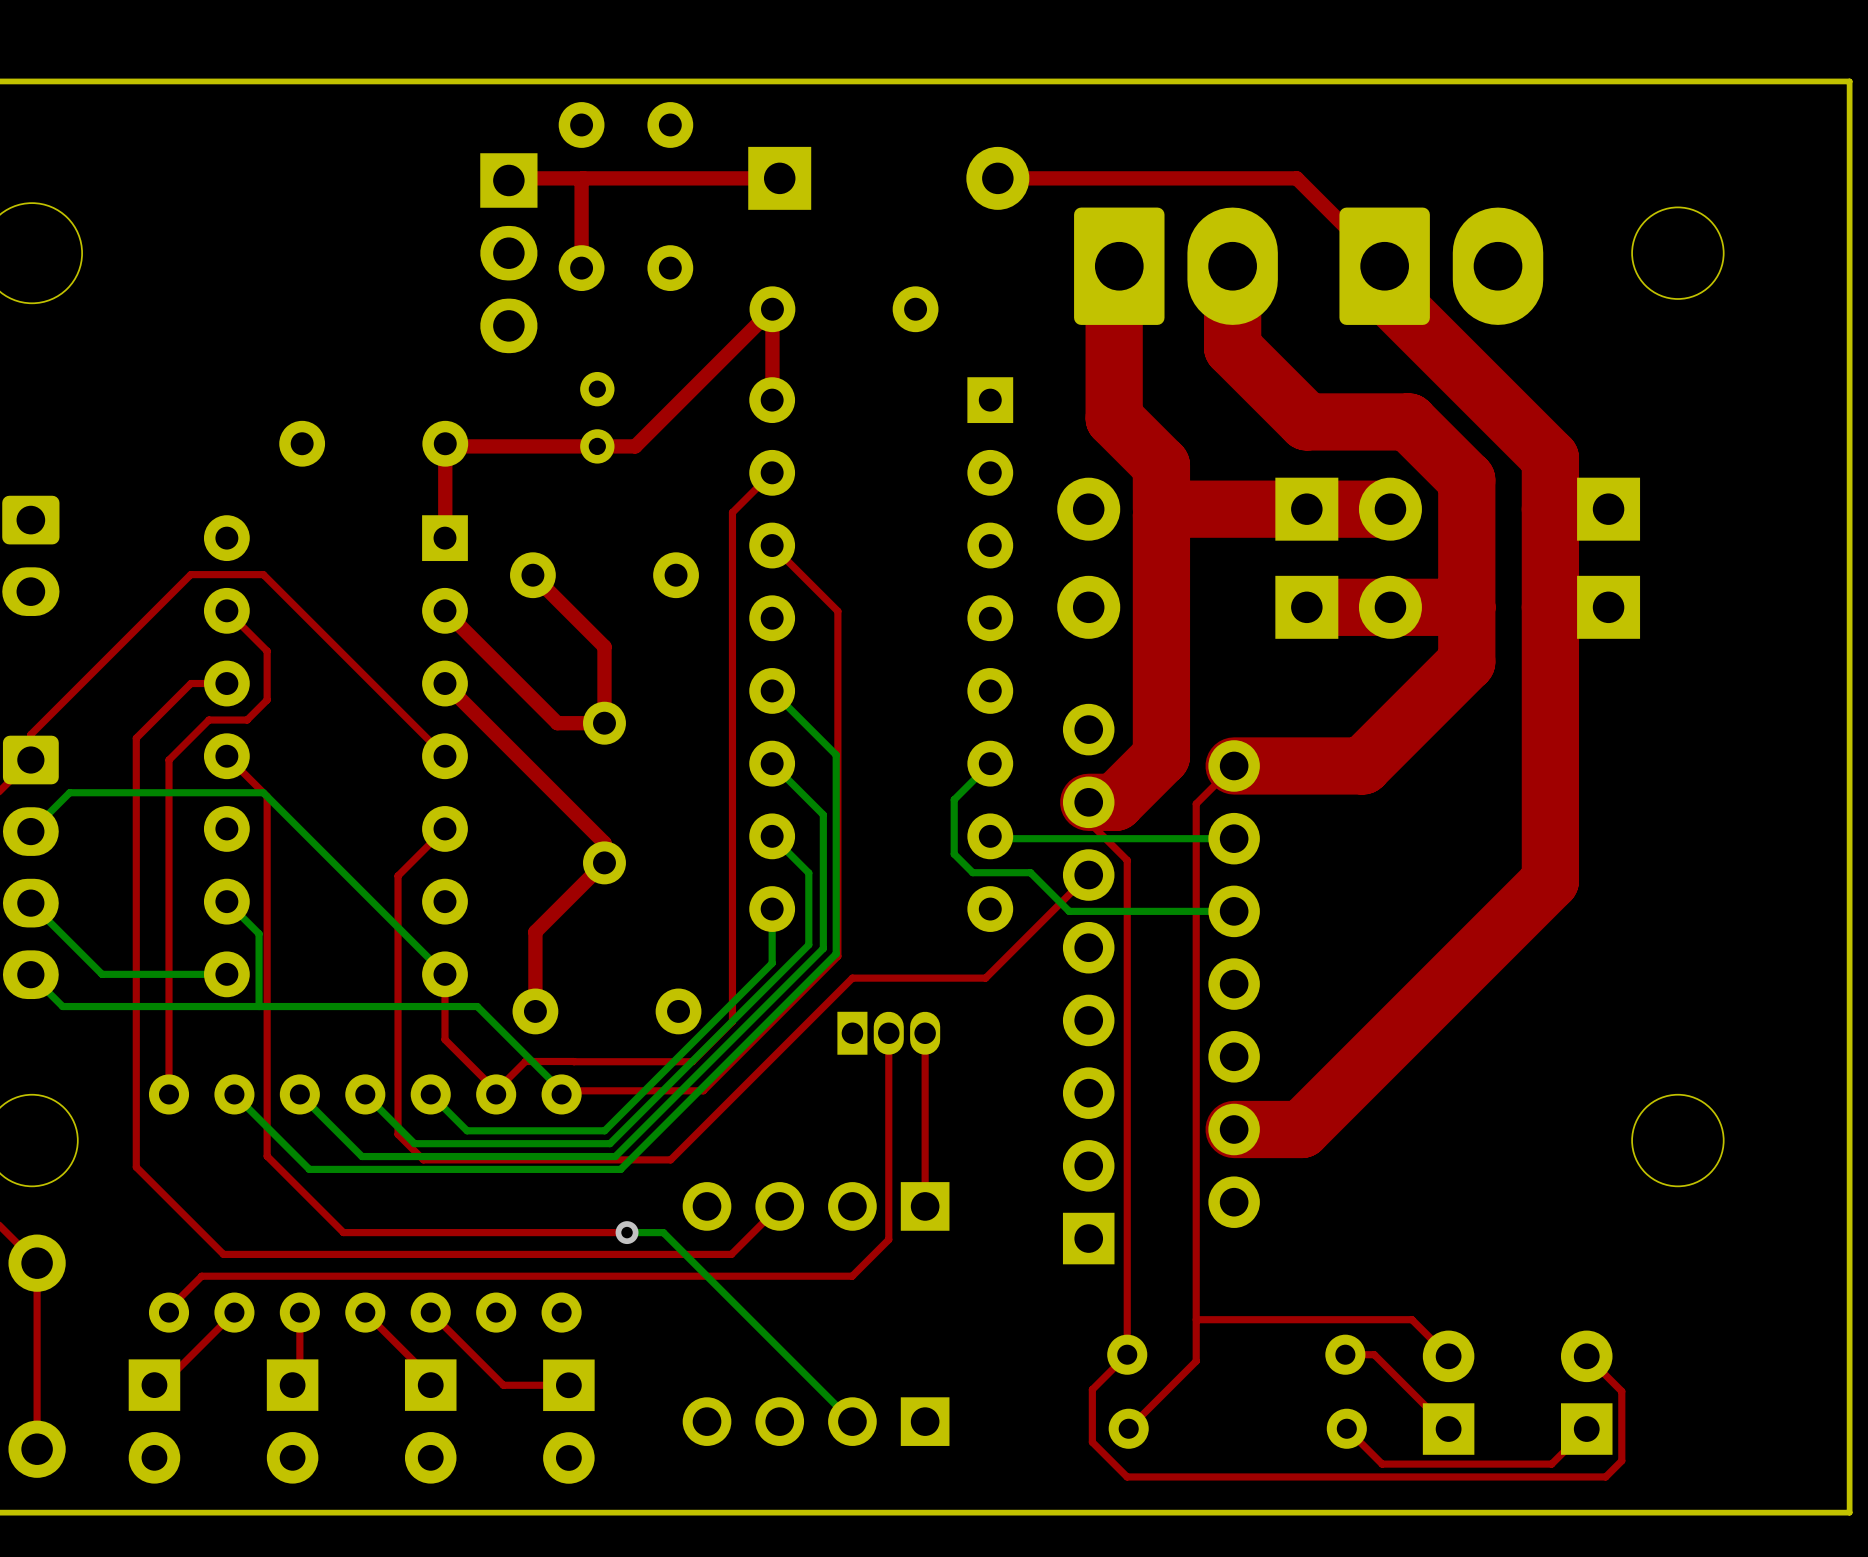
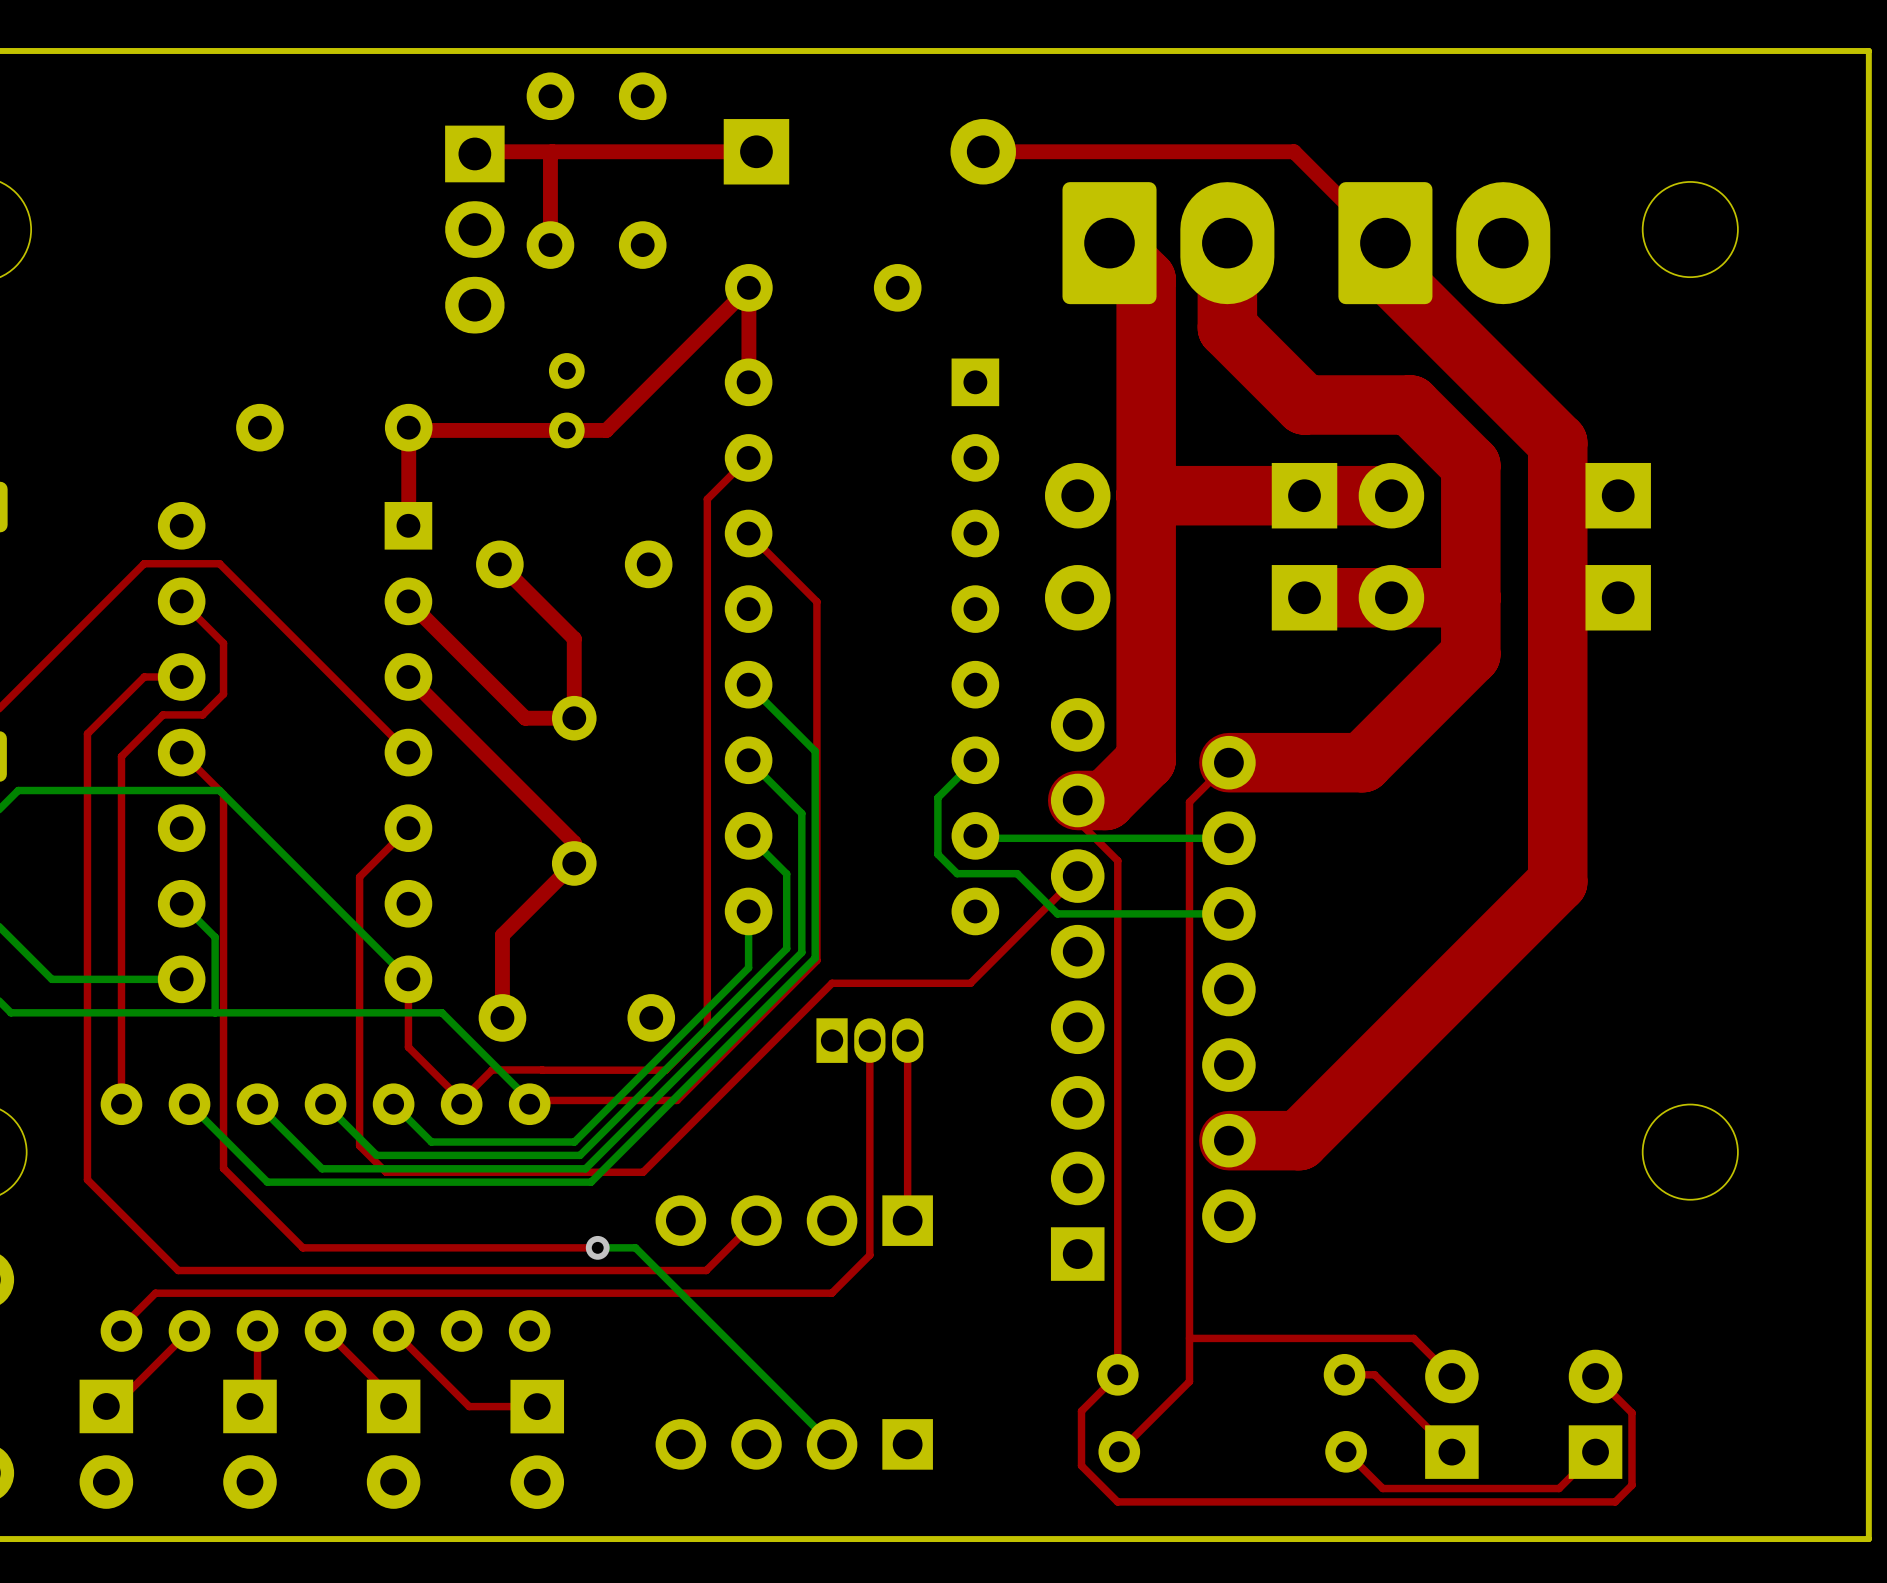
top track: (1119, 266) (1114, 271) (1114, 418) (1161, 465) (1161, 509) -> none
top track: (1167, 509) (1161, 515) (1161, 756) (1154, 763) -> (1109, 243) (1146, 279) (1146, 759)

